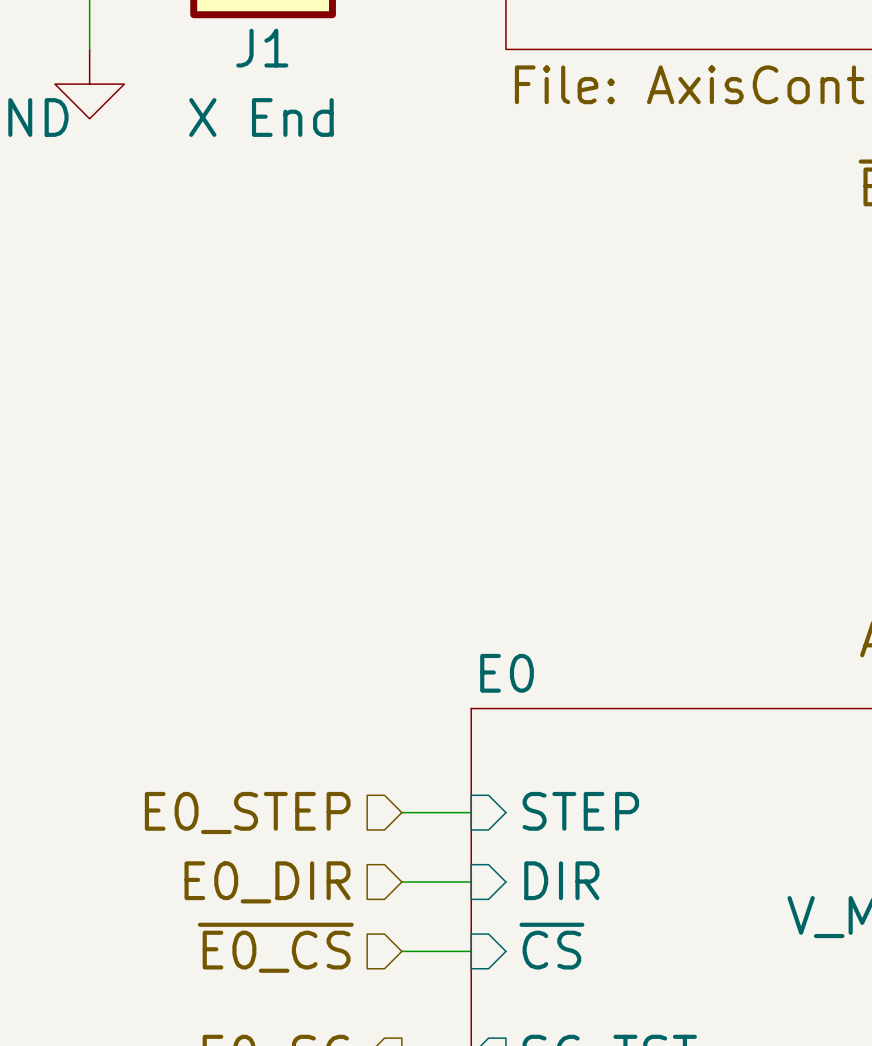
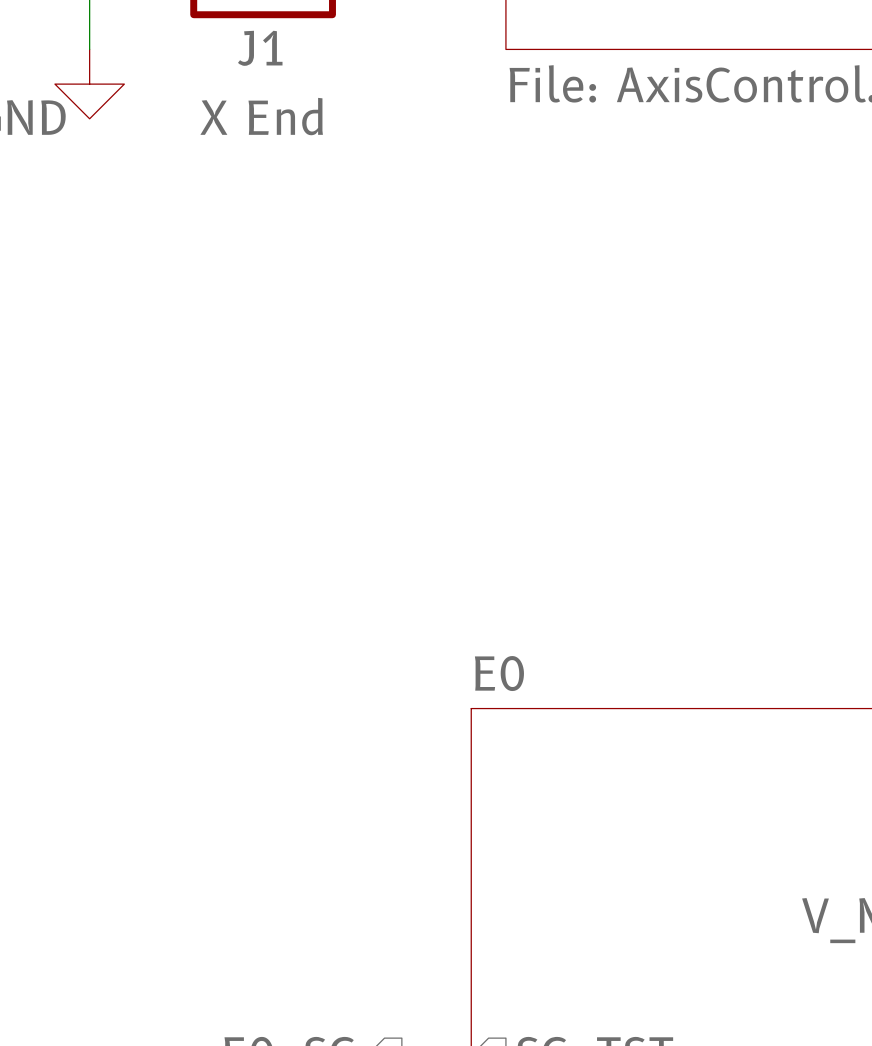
sheet pin: STEP (580, 811) -> none
hierarchical label: E0_STEP (247, 812) -> none
wire: (401, 812) (471, 812) -> none
sheet pin: DIR (561, 880) -> none
hierarchical label: E0_DIR (267, 882) -> none
wire: (401, 882) (471, 882) -> none
sheet pin: ~{CS} (551, 946) -> none
hierarchical label: ~{E0_CS} (275, 947) -> none
wire: (401, 951) (471, 951) -> none

